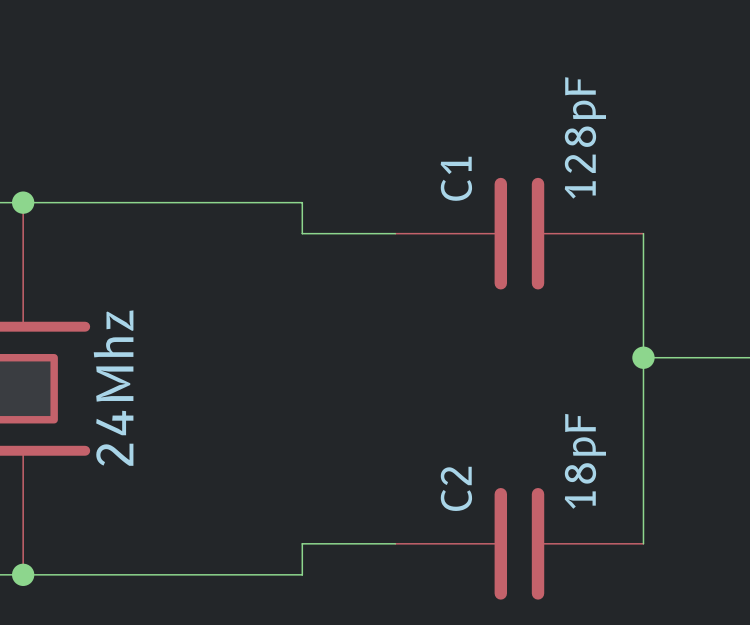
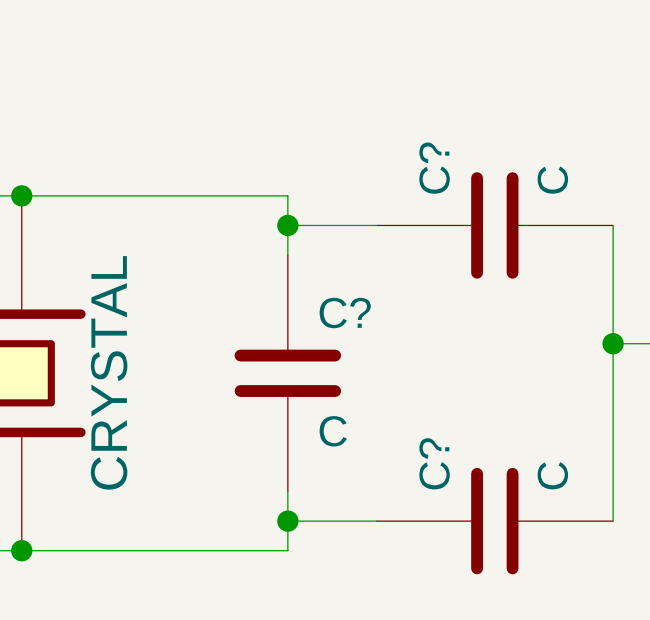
C1 value: 128pF (585, 137) -> C (552, 180)
C1 name: C1 (456, 178) -> C? (434, 168)
wire: none -> (287, 225) (287, 255)
junction: none -> (287, 225)
part value: 24Mhz (113, 388) -> CRYSTAL (109, 372)
C?: none -> C (287, 373)
C2 value: 18pF (585, 461) -> C (552, 475)
C2 name: C2 (456, 488) -> C? (434, 463)
wire: none -> (287, 491) (287, 521)
junction: none -> (287, 521)

